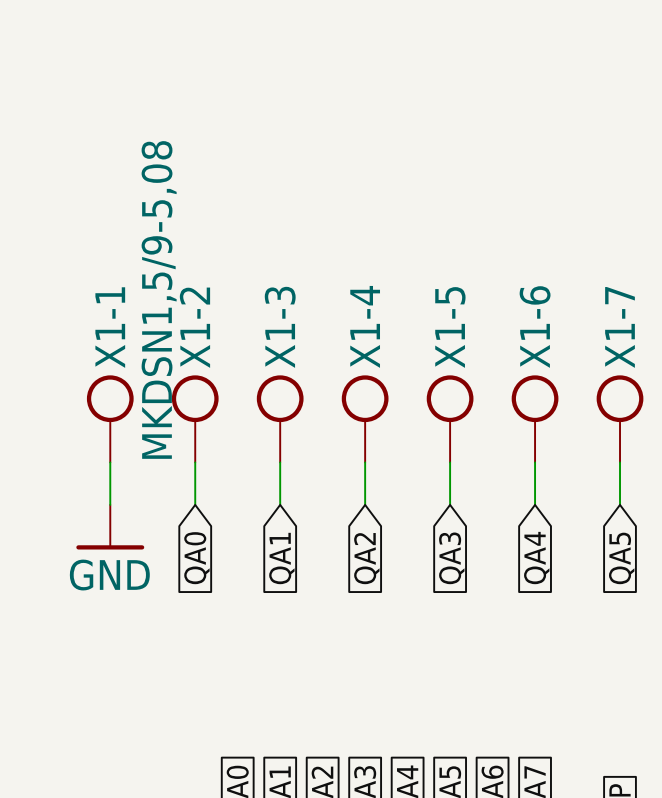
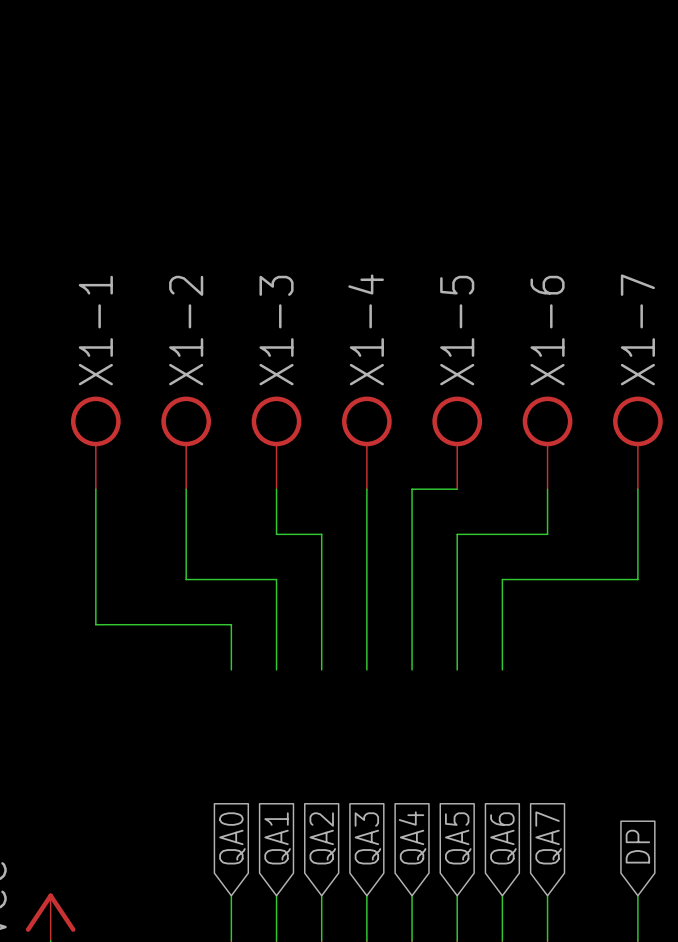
X1-1 value: MKDSN1,5/9-5,08 (159, 299) -> none
wire: (450, 462) (450, 504) -> (457, 489) (412, 489) (412, 669)
wire: none -> (95, 534) (95, 624) (231, 624) (231, 669)
wire: none -> (186, 534) (186, 579) (276, 579) (276, 669)
wire: none -> (276, 534) (321, 534) (321, 669)
wire: none -> (366, 534) (366, 669)
wire: none -> (547, 534) (457, 534) (457, 669)
wire: none -> (637, 534) (637, 579) (502, 579) (502, 669)
power symbol: GND (110, 527) -> none
global label: QA0 (196, 558) -> none
global label: QA1 (281, 558) -> none
global label: QA2 (366, 558) -> none
global label: QA3 (451, 558) -> none
global label: QA4 (536, 558) -> none
global label: QA5 (621, 558) -> none

